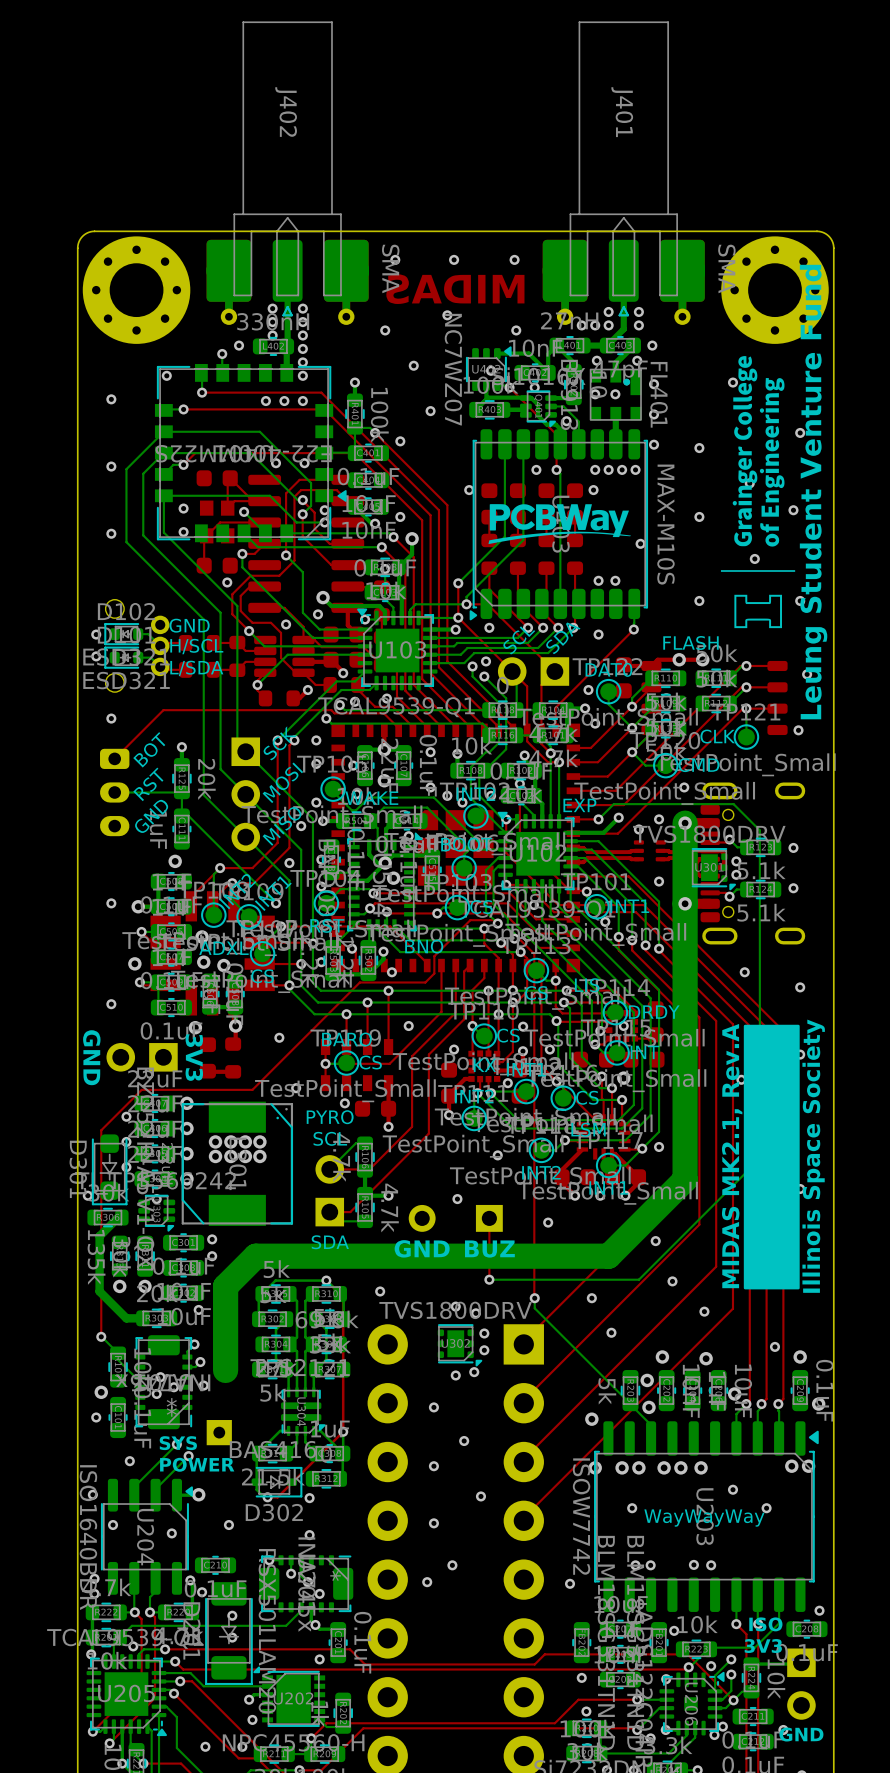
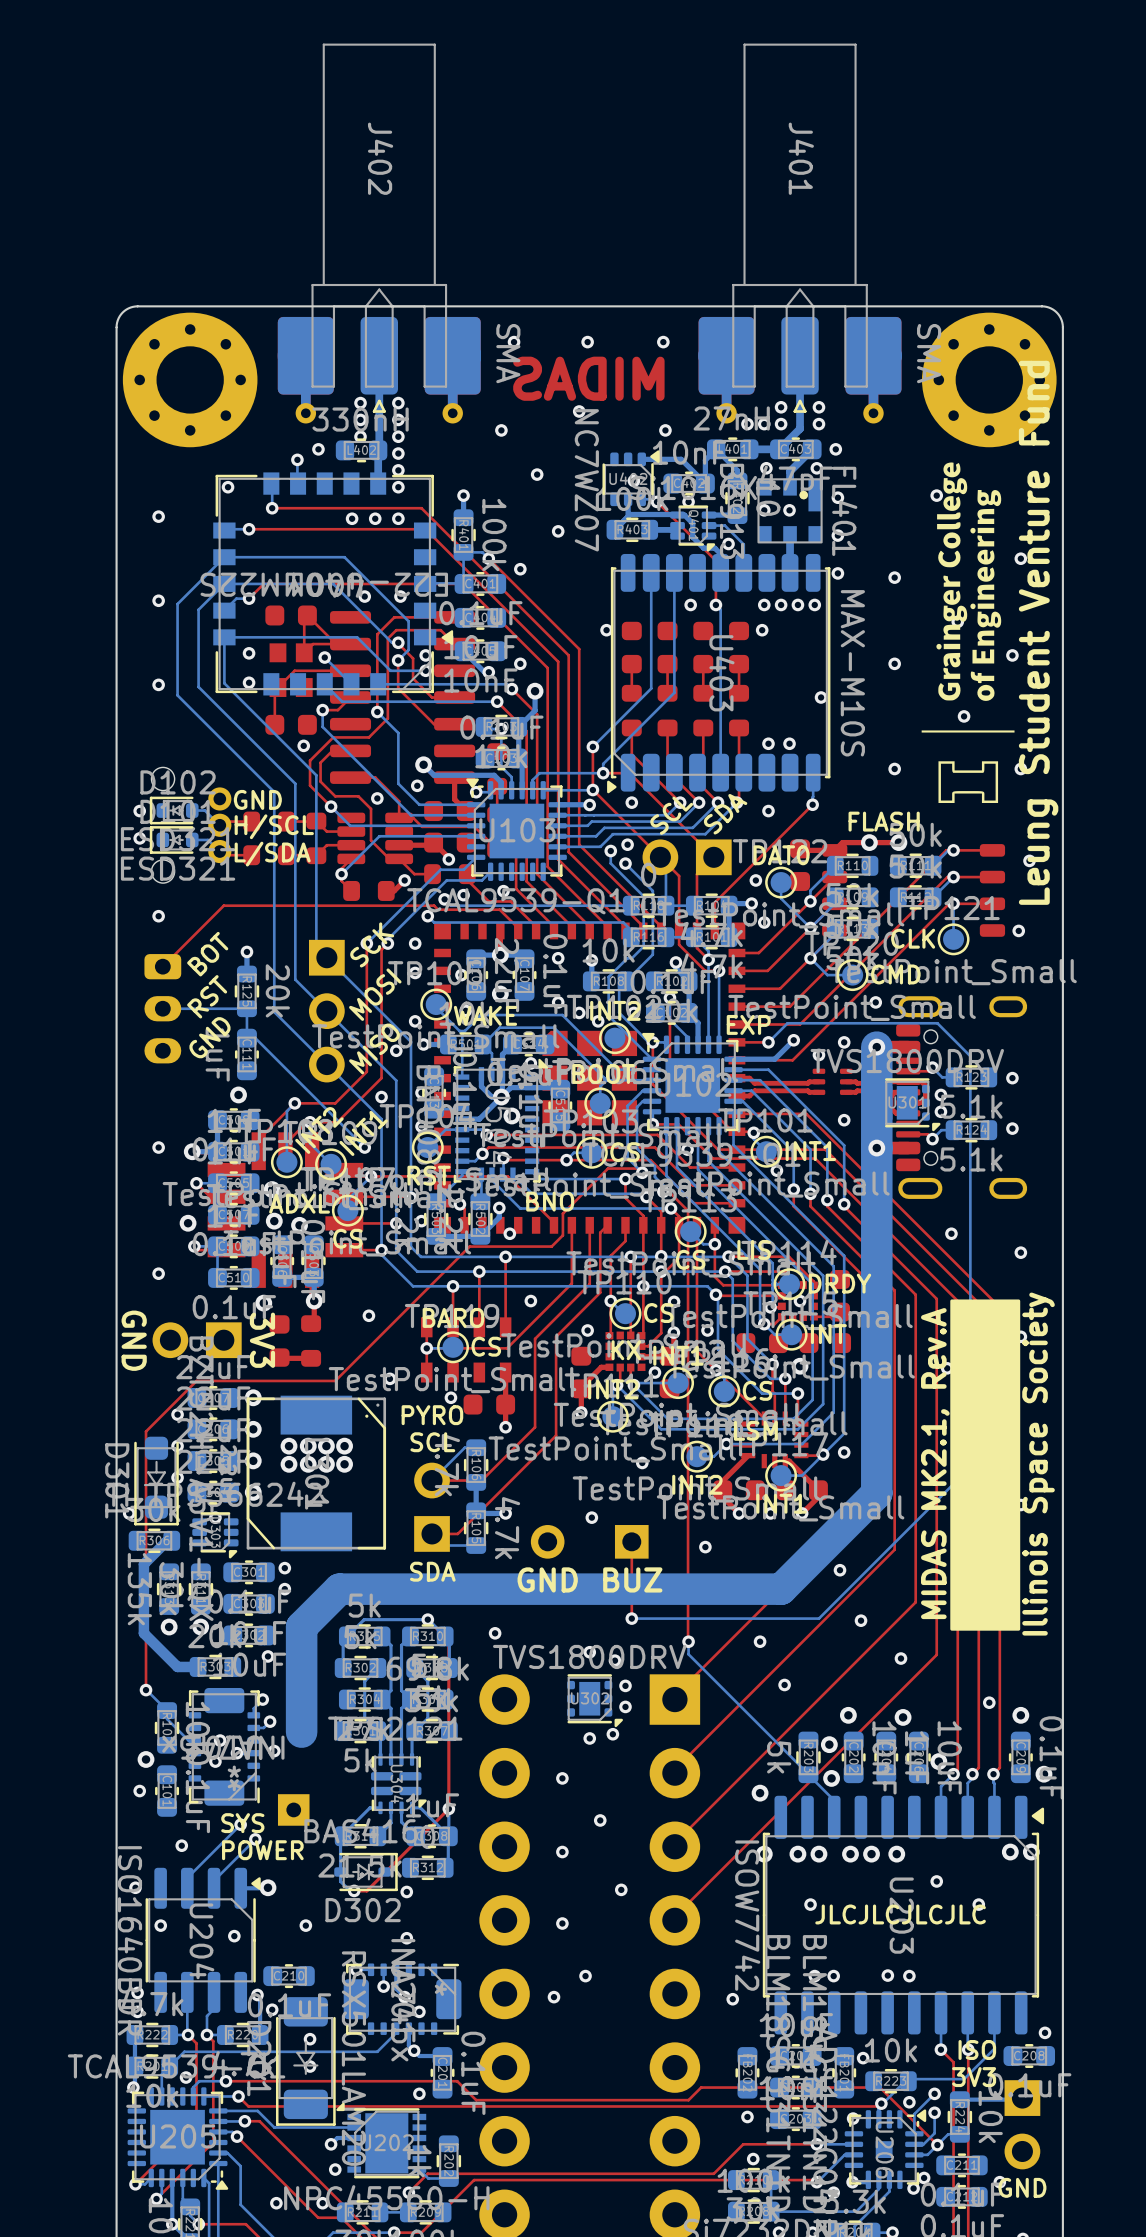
drawing: [488, 504, 631, 545] -> none
text: WayWayWay (704, 1518) -> JLCJLCJLCJLC (900, 1914)

